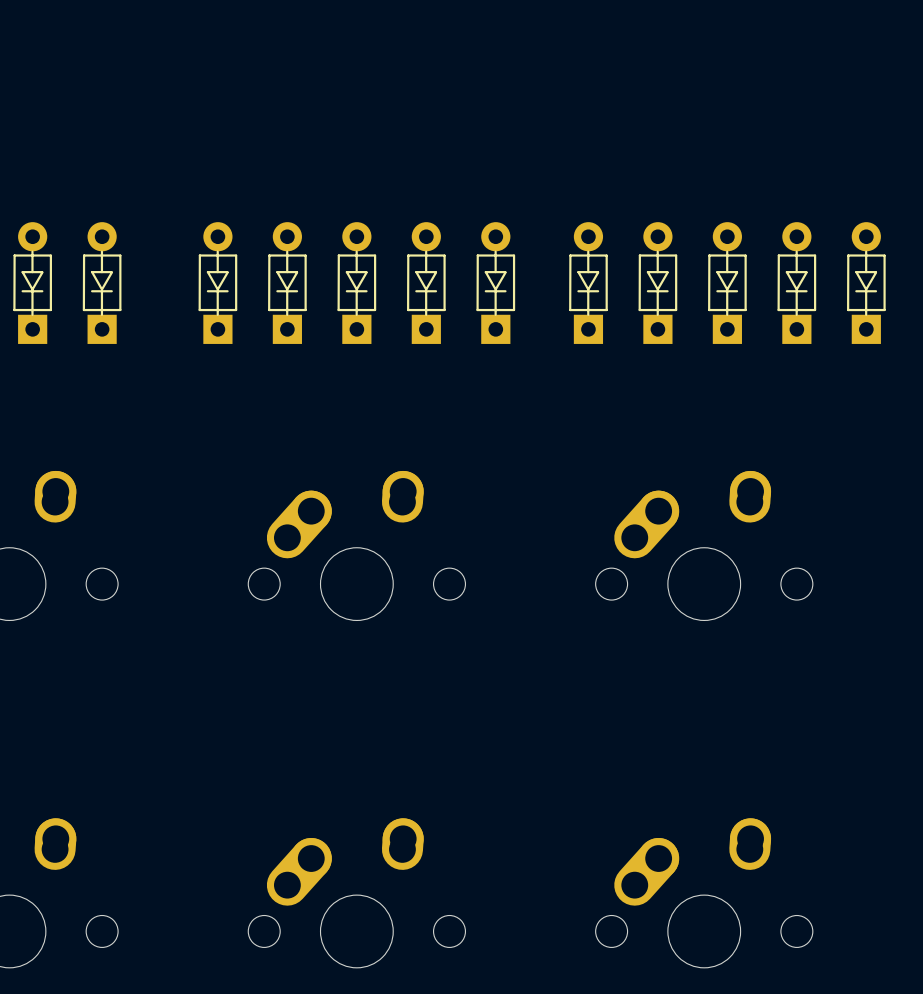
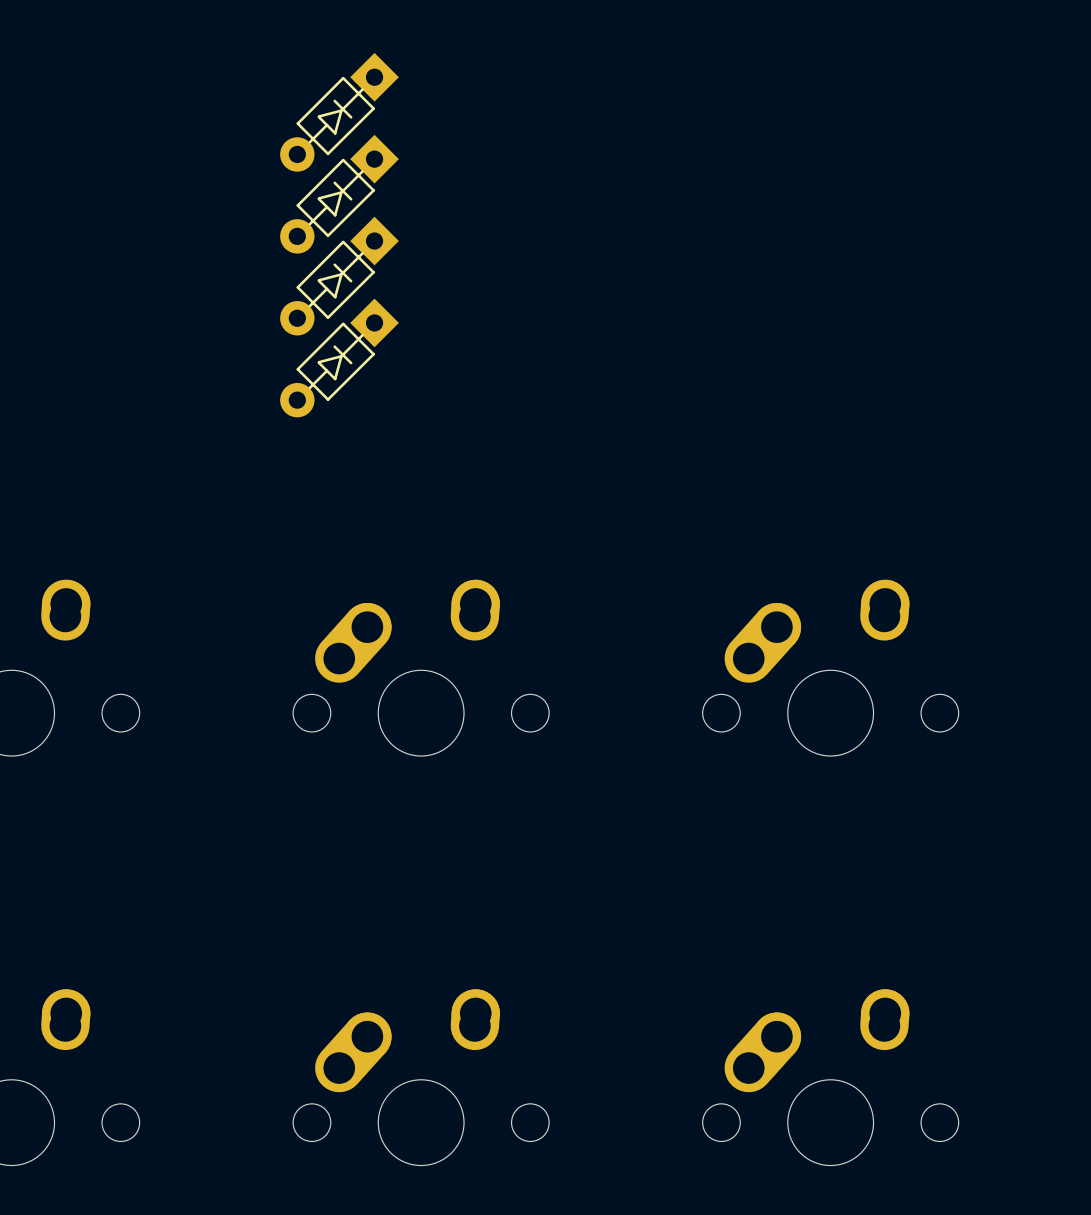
part: none -> (339, 112)
part: none -> (339, 194)
part: none -> (339, 276)
part: (32, 283) -> none
part: (102, 283) -> none
part: (217, 283) -> none
part rotation: 0° (287, 283) -> 135° counterclockwise (339, 358)
part: (356, 283) -> none
part: (426, 283) -> none
part: (495, 283) -> none
part: (588, 283) -> none
part: (657, 283) -> none
part: (727, 283) -> none
part: (796, 283) -> none
part: (866, 283) -> none

